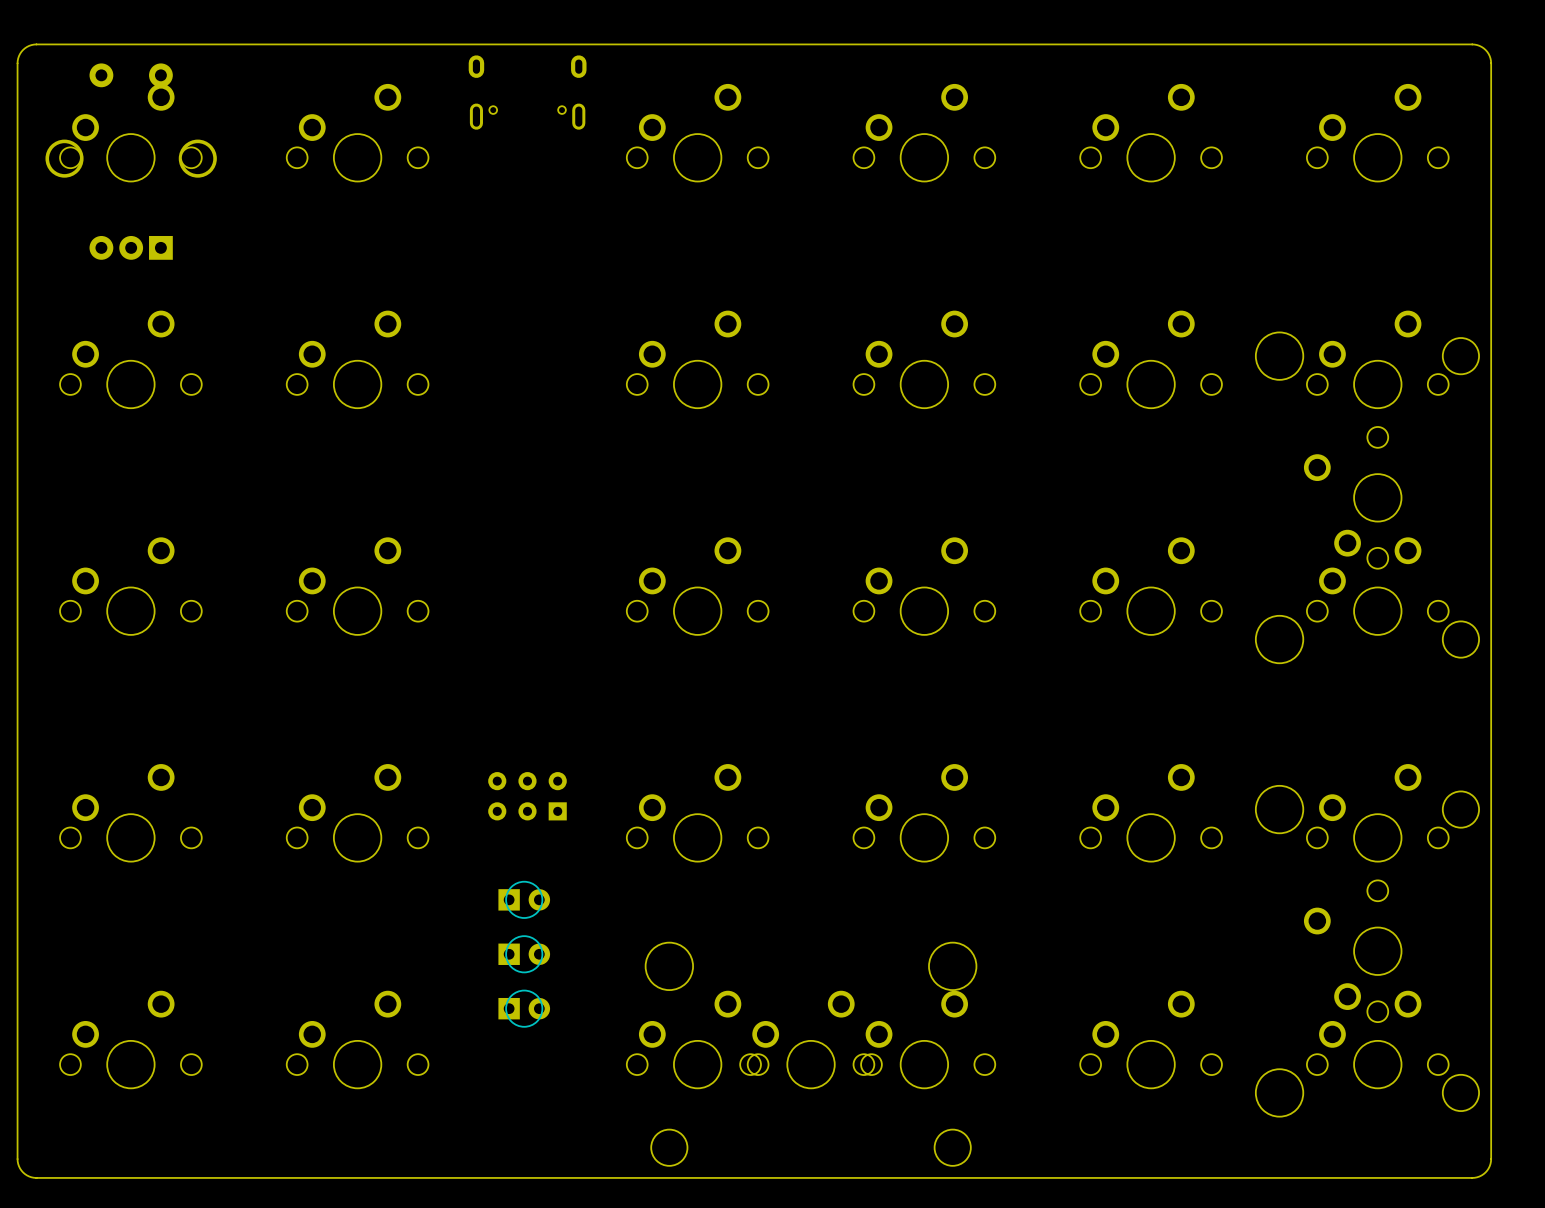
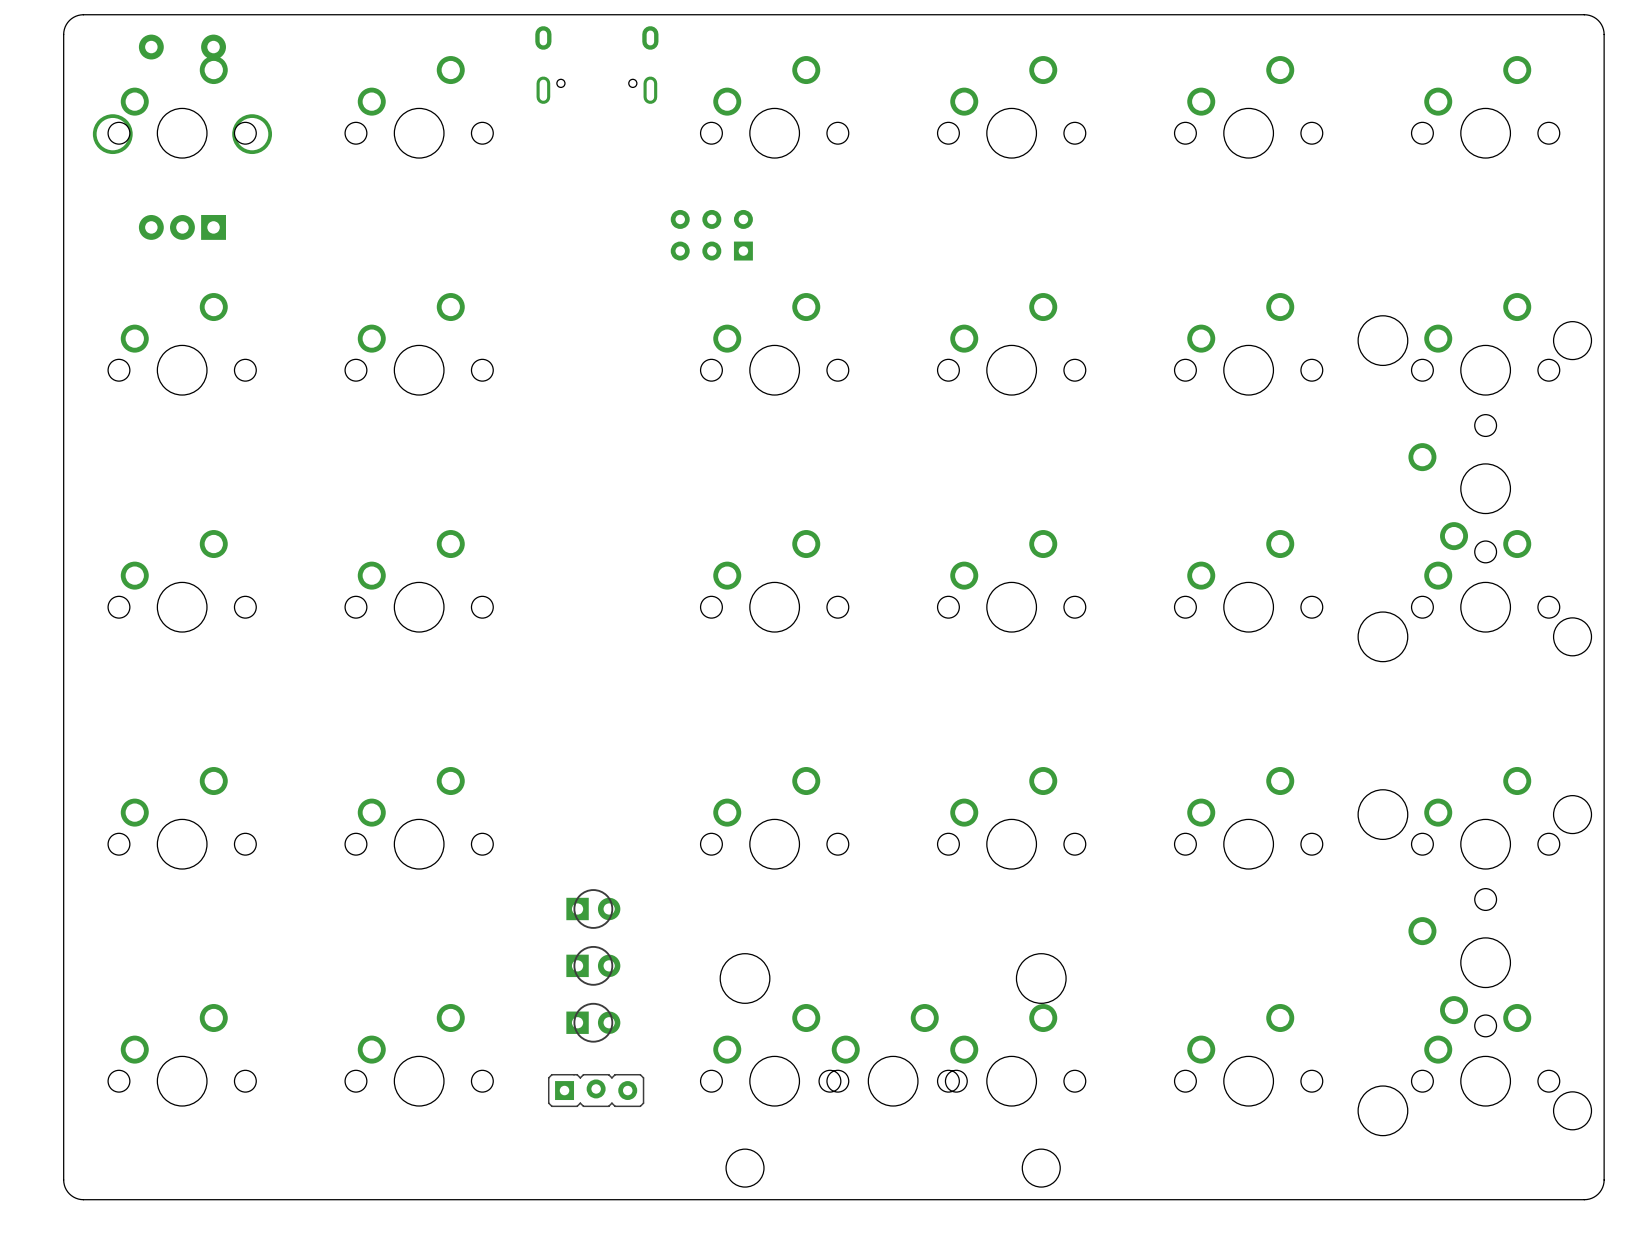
part: none -> (711, 235)
part: (527, 796) -> none
part: none -> (596, 1090)

